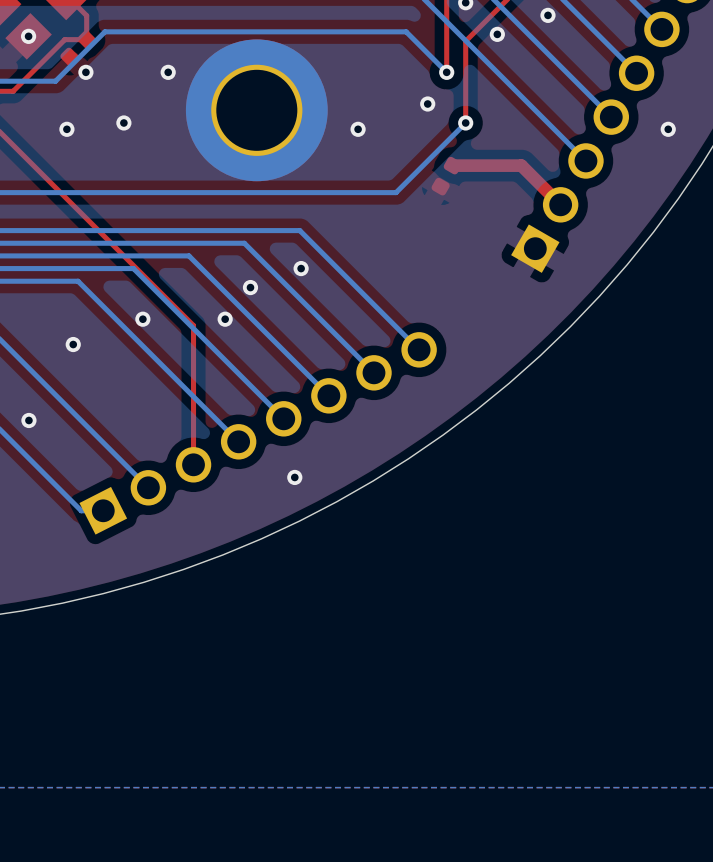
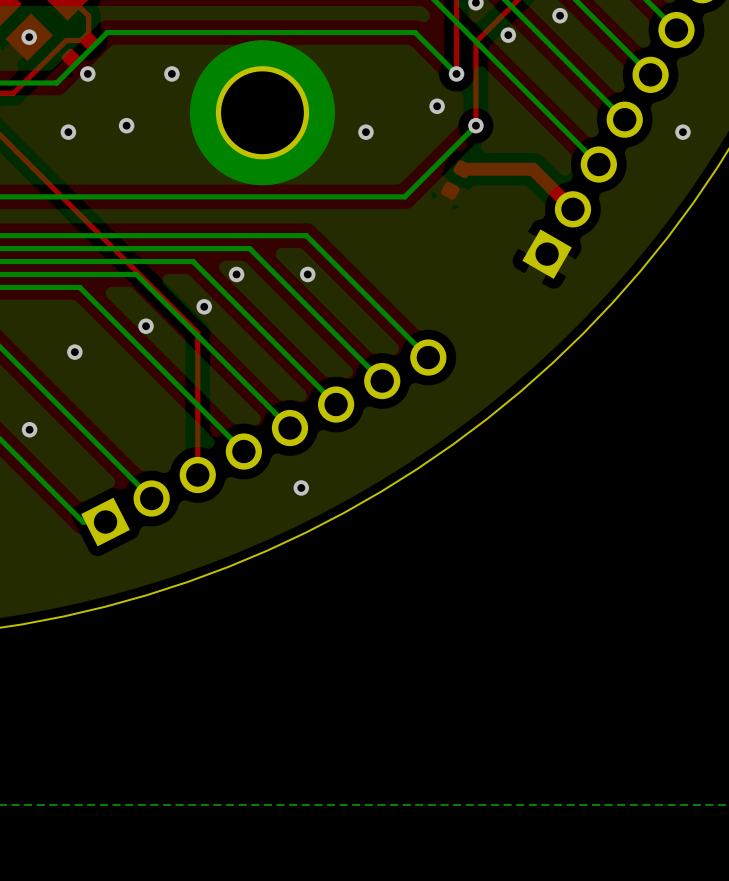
via: none -> (236, 274)
via: (250, 287) -> none
via: none -> (204, 306)
via: (225, 319) -> none

